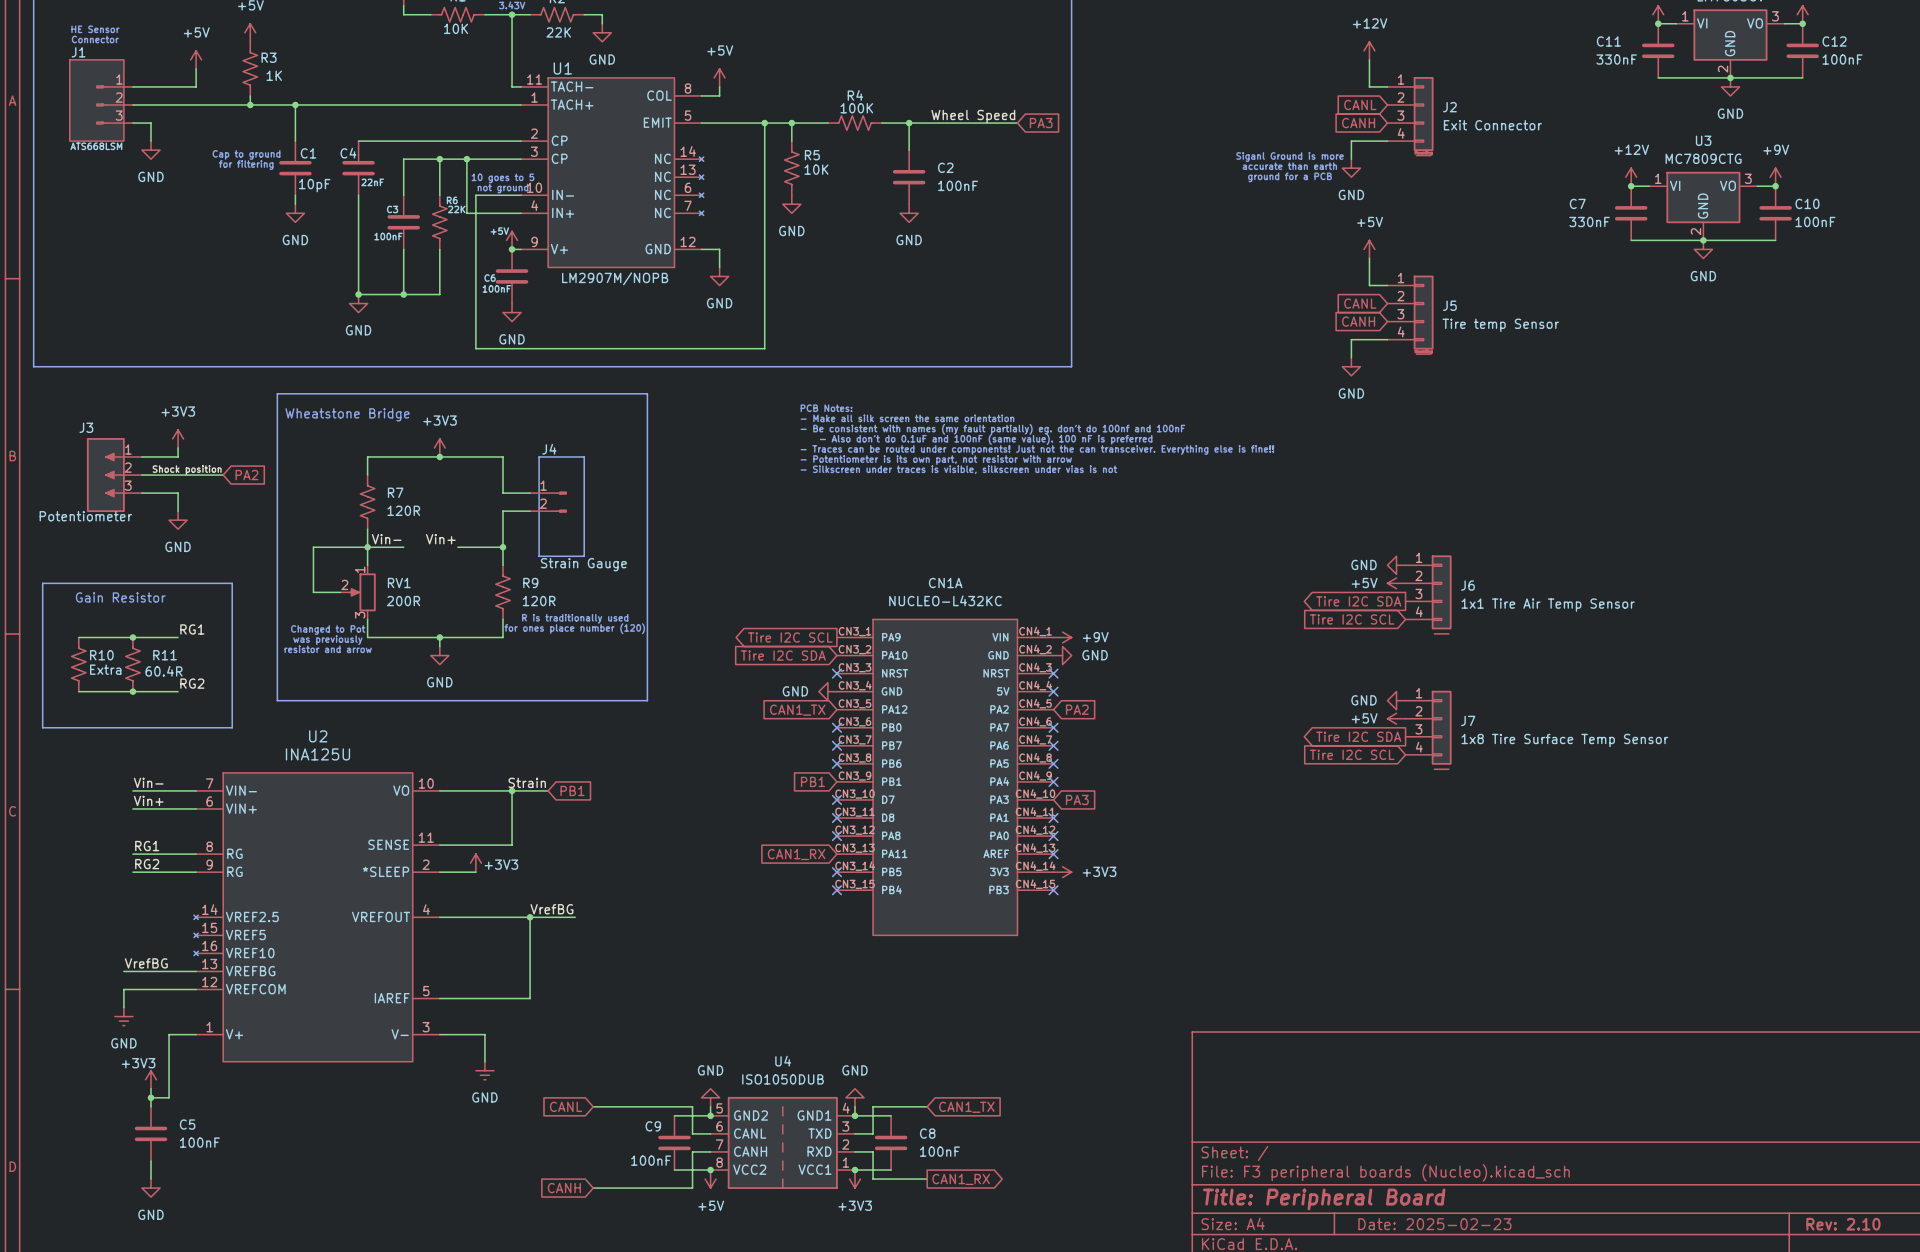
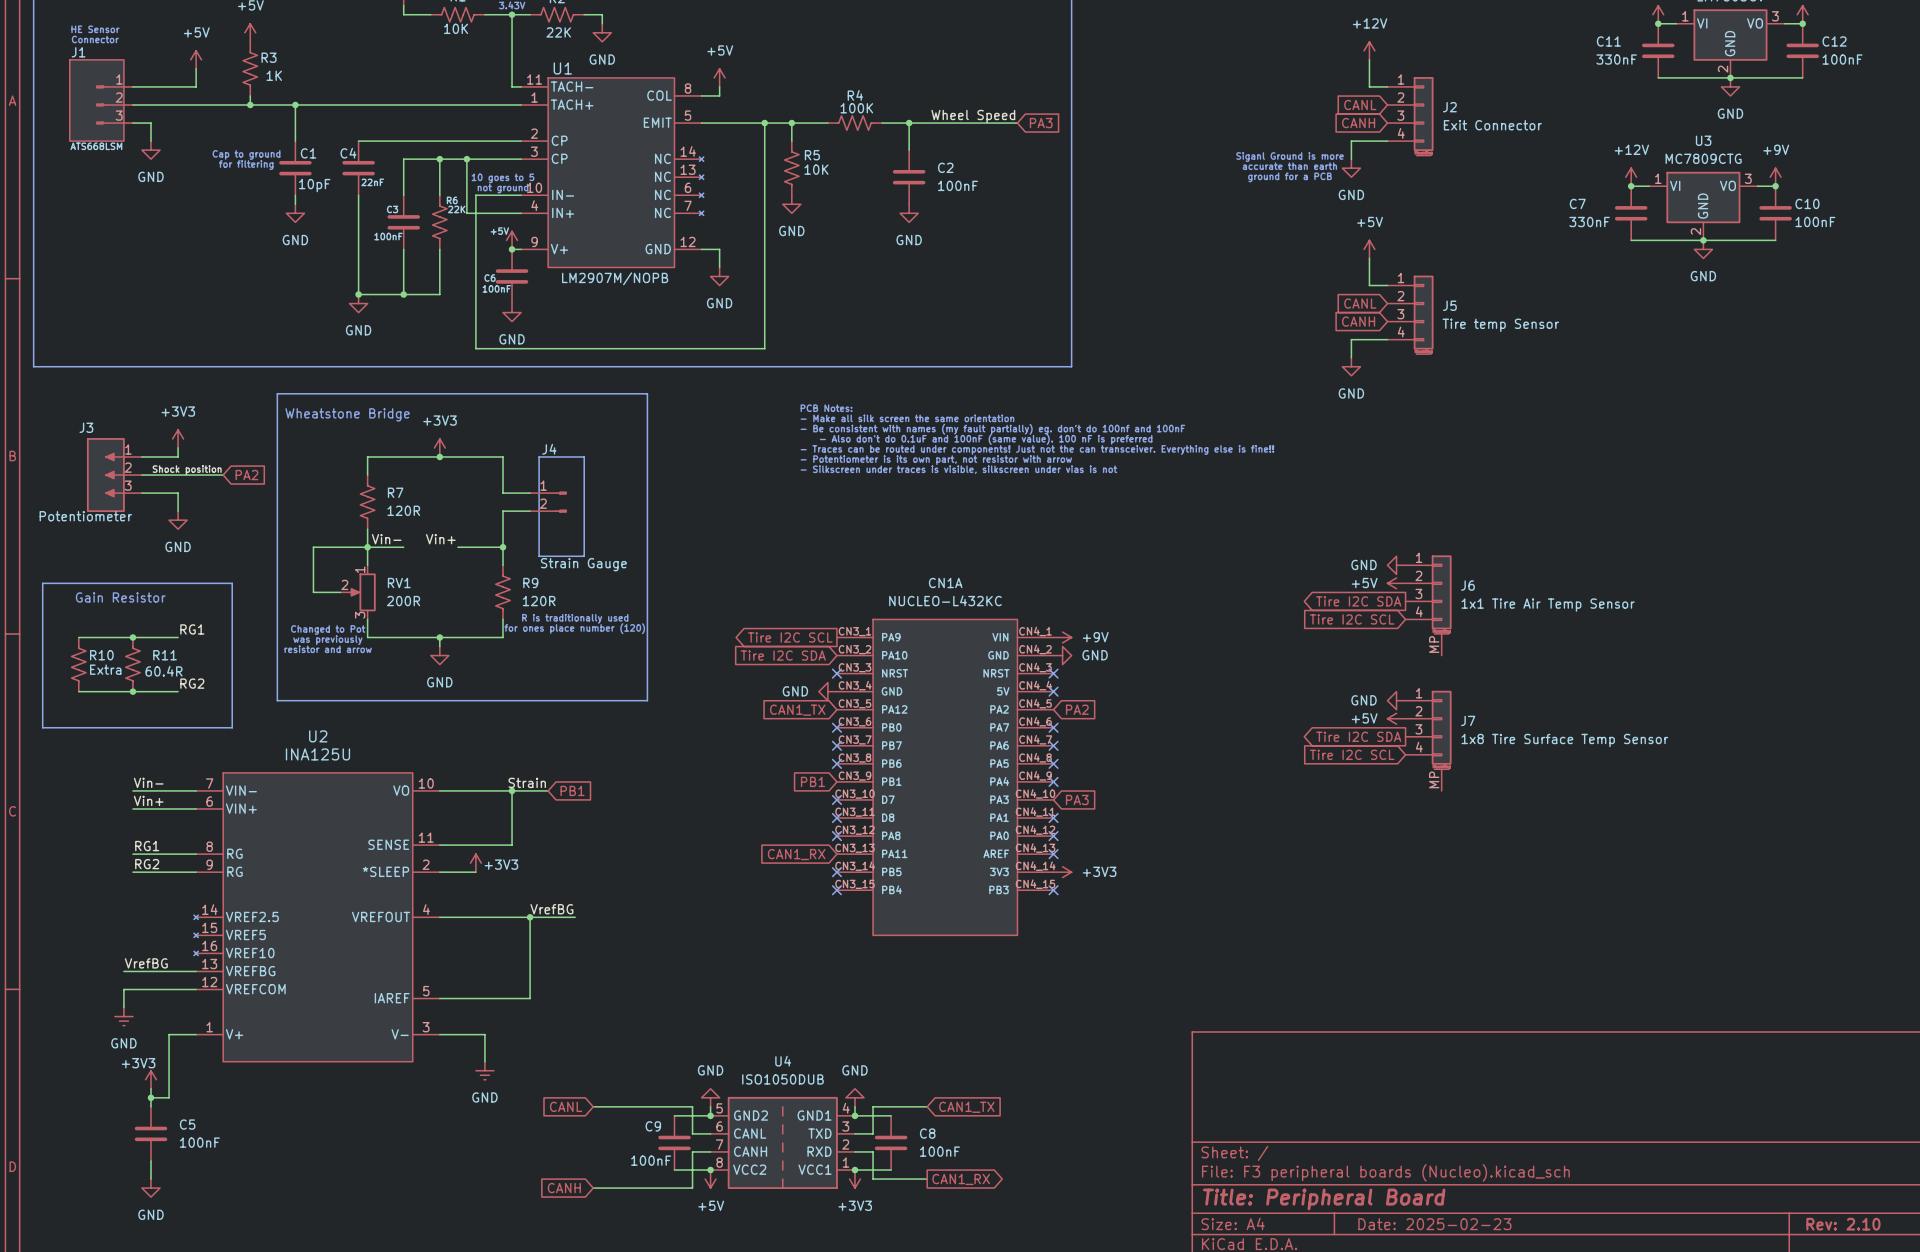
J6 symbol: [1405, 555, 1452, 635] -> [1405, 555, 1452, 656]
J7 symbol: [1405, 690, 1452, 770] -> [1405, 690, 1452, 791]

